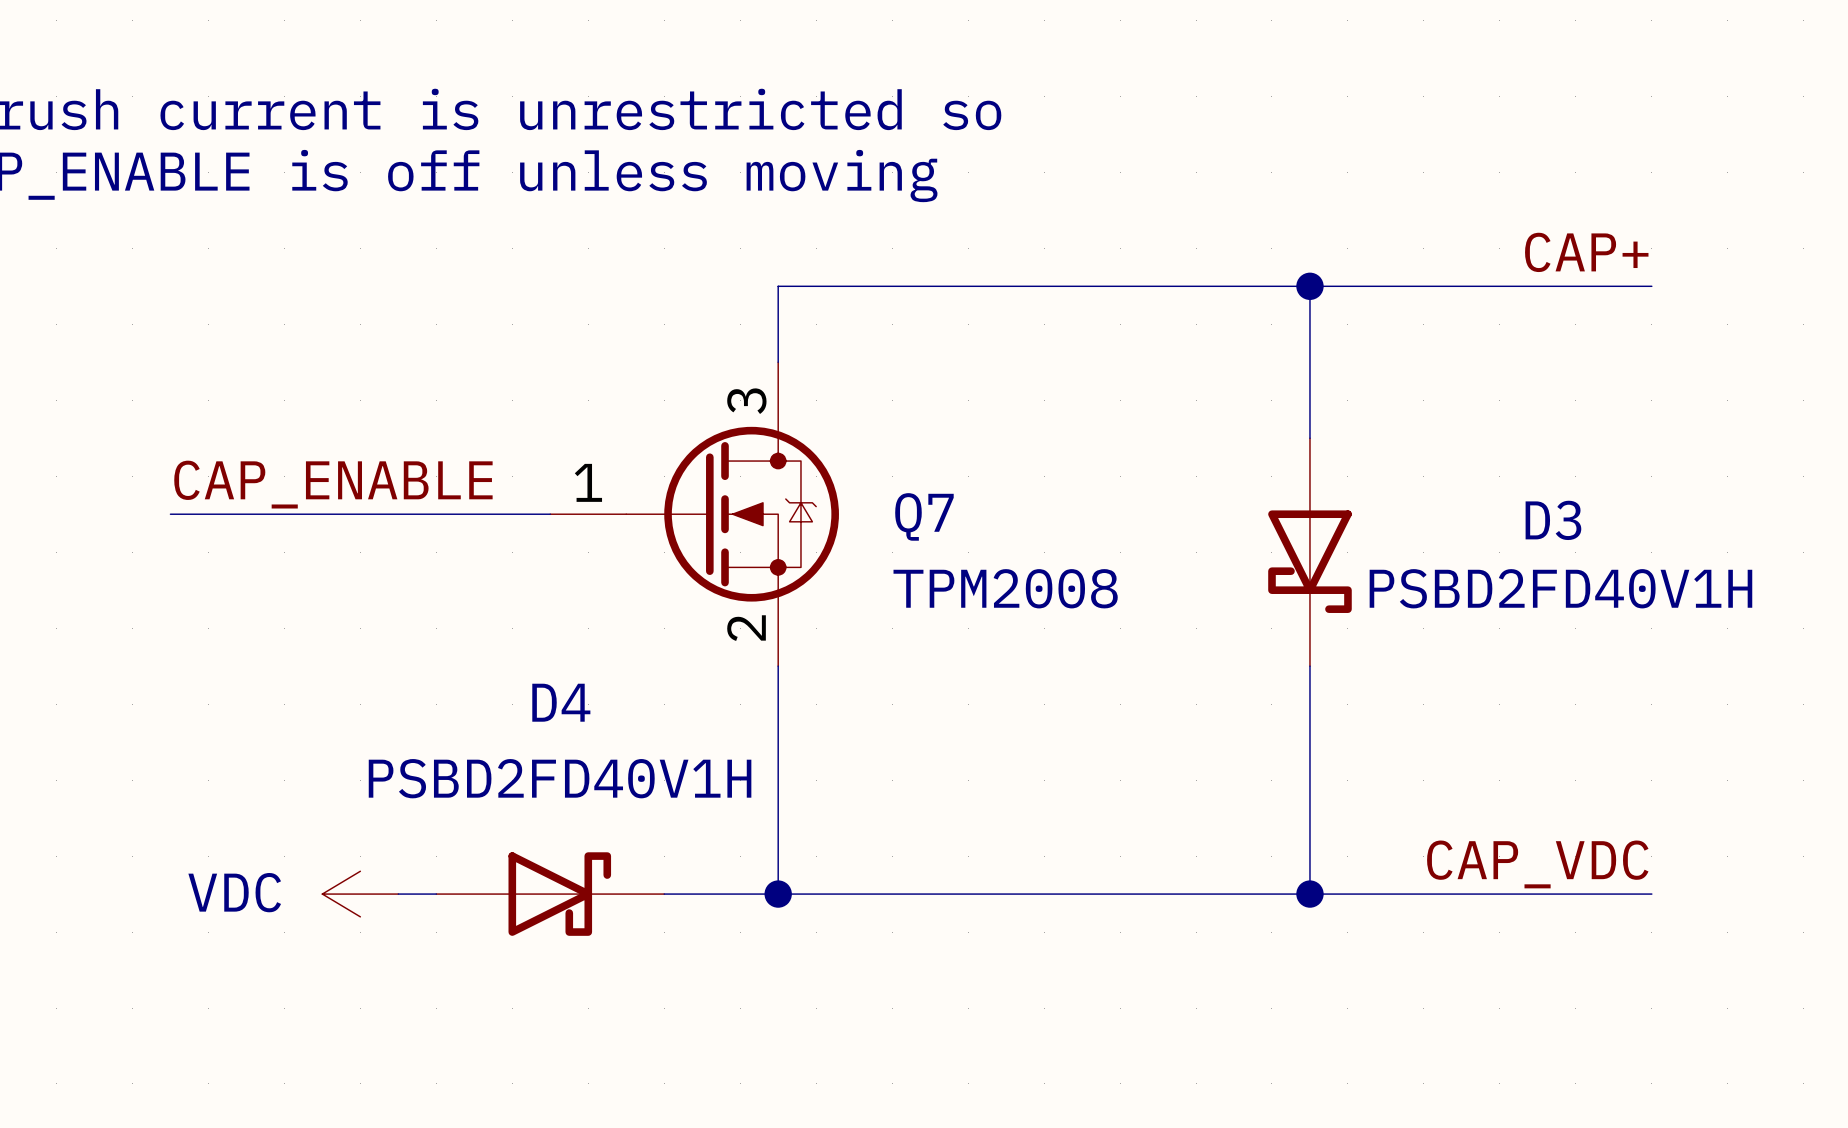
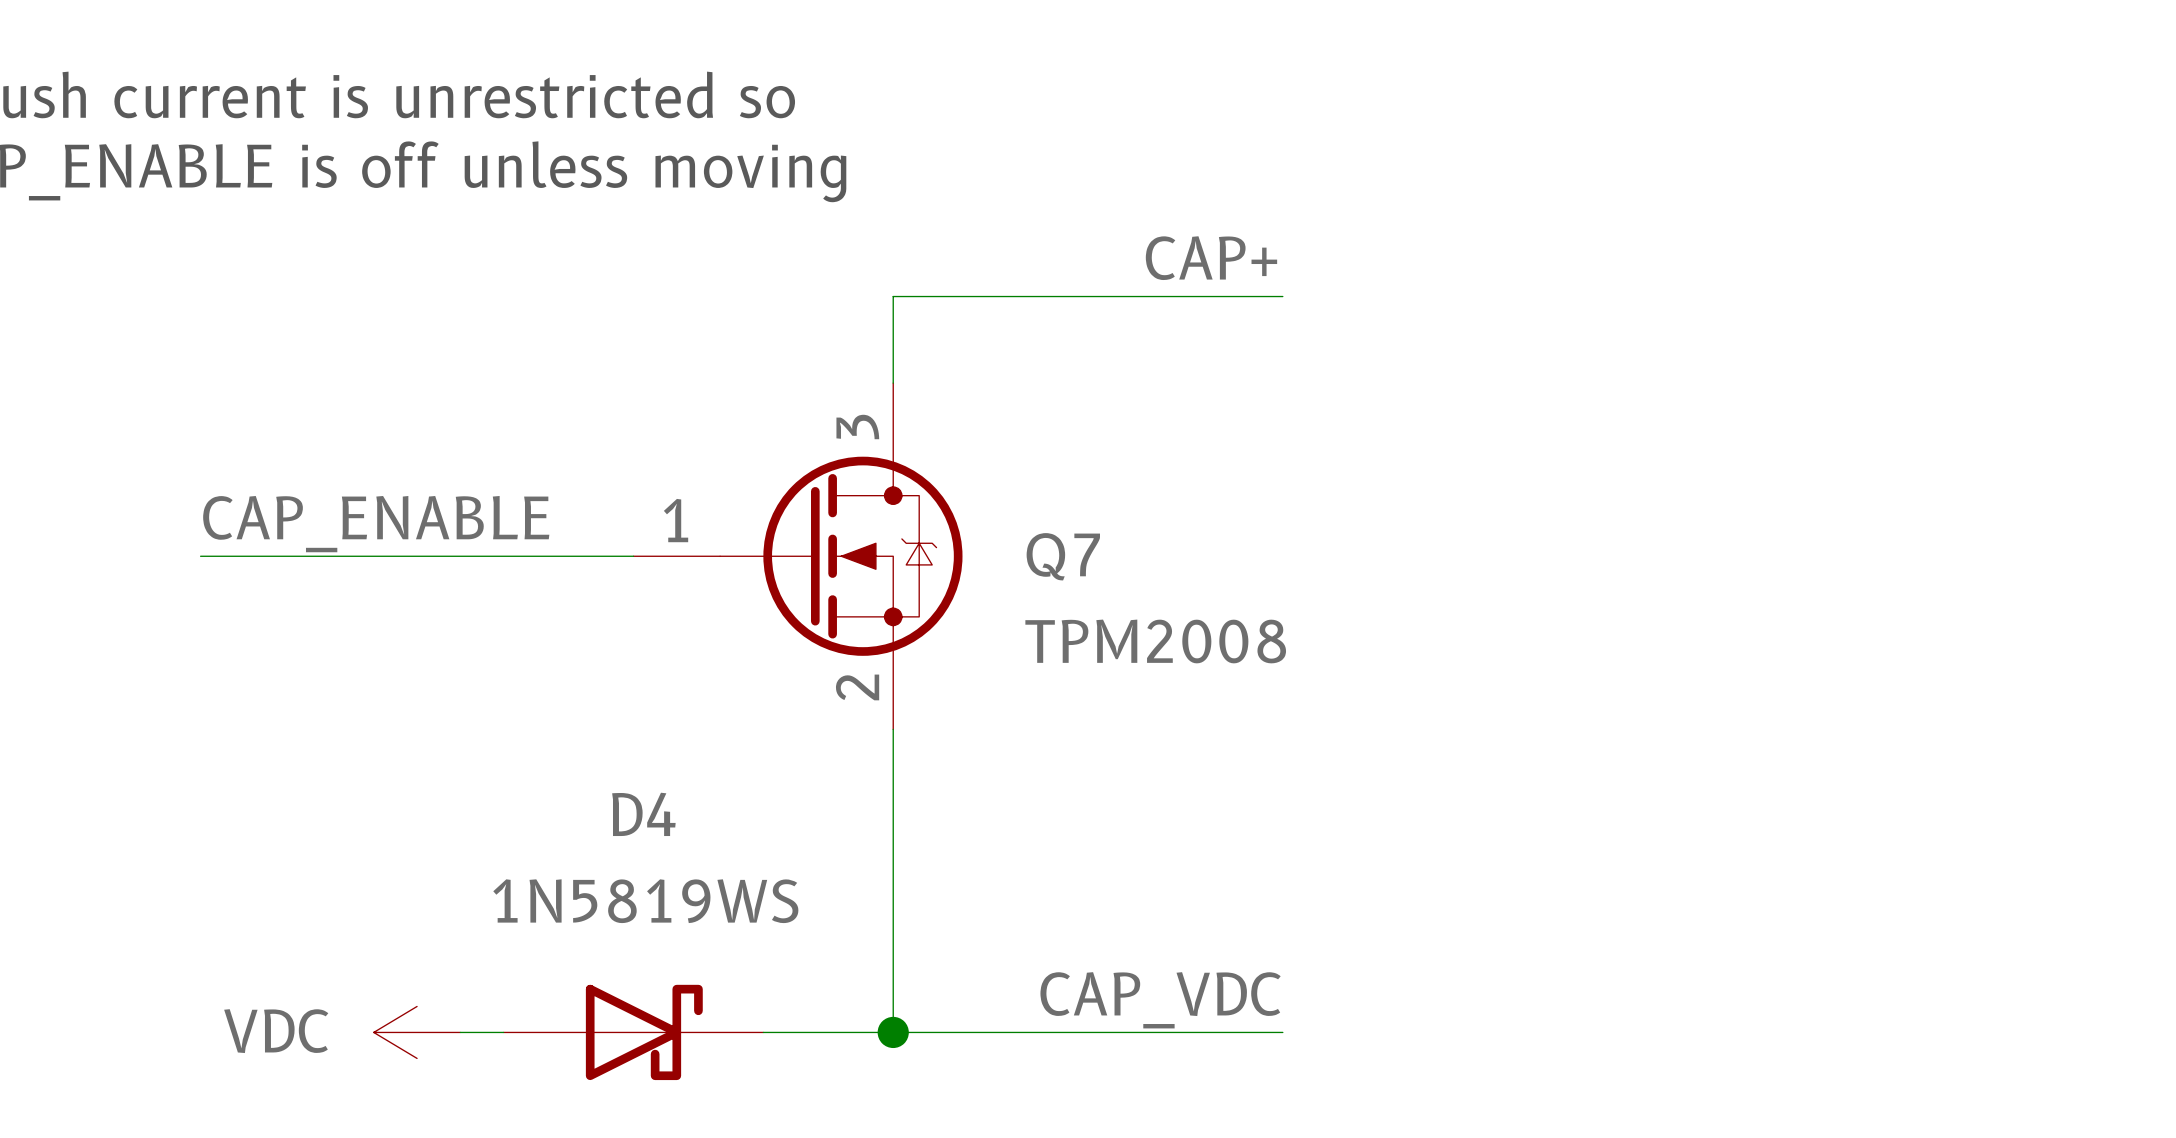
label position: CAP+ (1586, 252) -> CAP+ (1211, 258)
wire: (1120, 286) (1651, 286) -> none
wire: (1309, 286) (1309, 438) -> none
junction: (1309, 286) -> none
D3: PSBD2FD40V1H (1309, 552) -> none
wire: (1309, 666) (1309, 894) -> none
D4 value: PSBD2FD40V1H (560, 778) -> 1N5819WS (645, 901)
label position: CAP_VDC (1537, 864) -> CAP_VDC (1160, 1000)
power symbol position: VDC (360, 894) -> VDC (417, 1032)
wire: (398, 894) (436, 894) -> (460, 1032) (503, 1032)
D4 position: (550, 894) -> (633, 1032)
wire: (664, 894) (1651, 894) -> none
wire: none -> (893, 989) (893, 1032)
junction position: (778, 894) -> (893, 1032)
junction: (1309, 894) -> none
wire: none -> (763, 1032) (1282, 1032)

